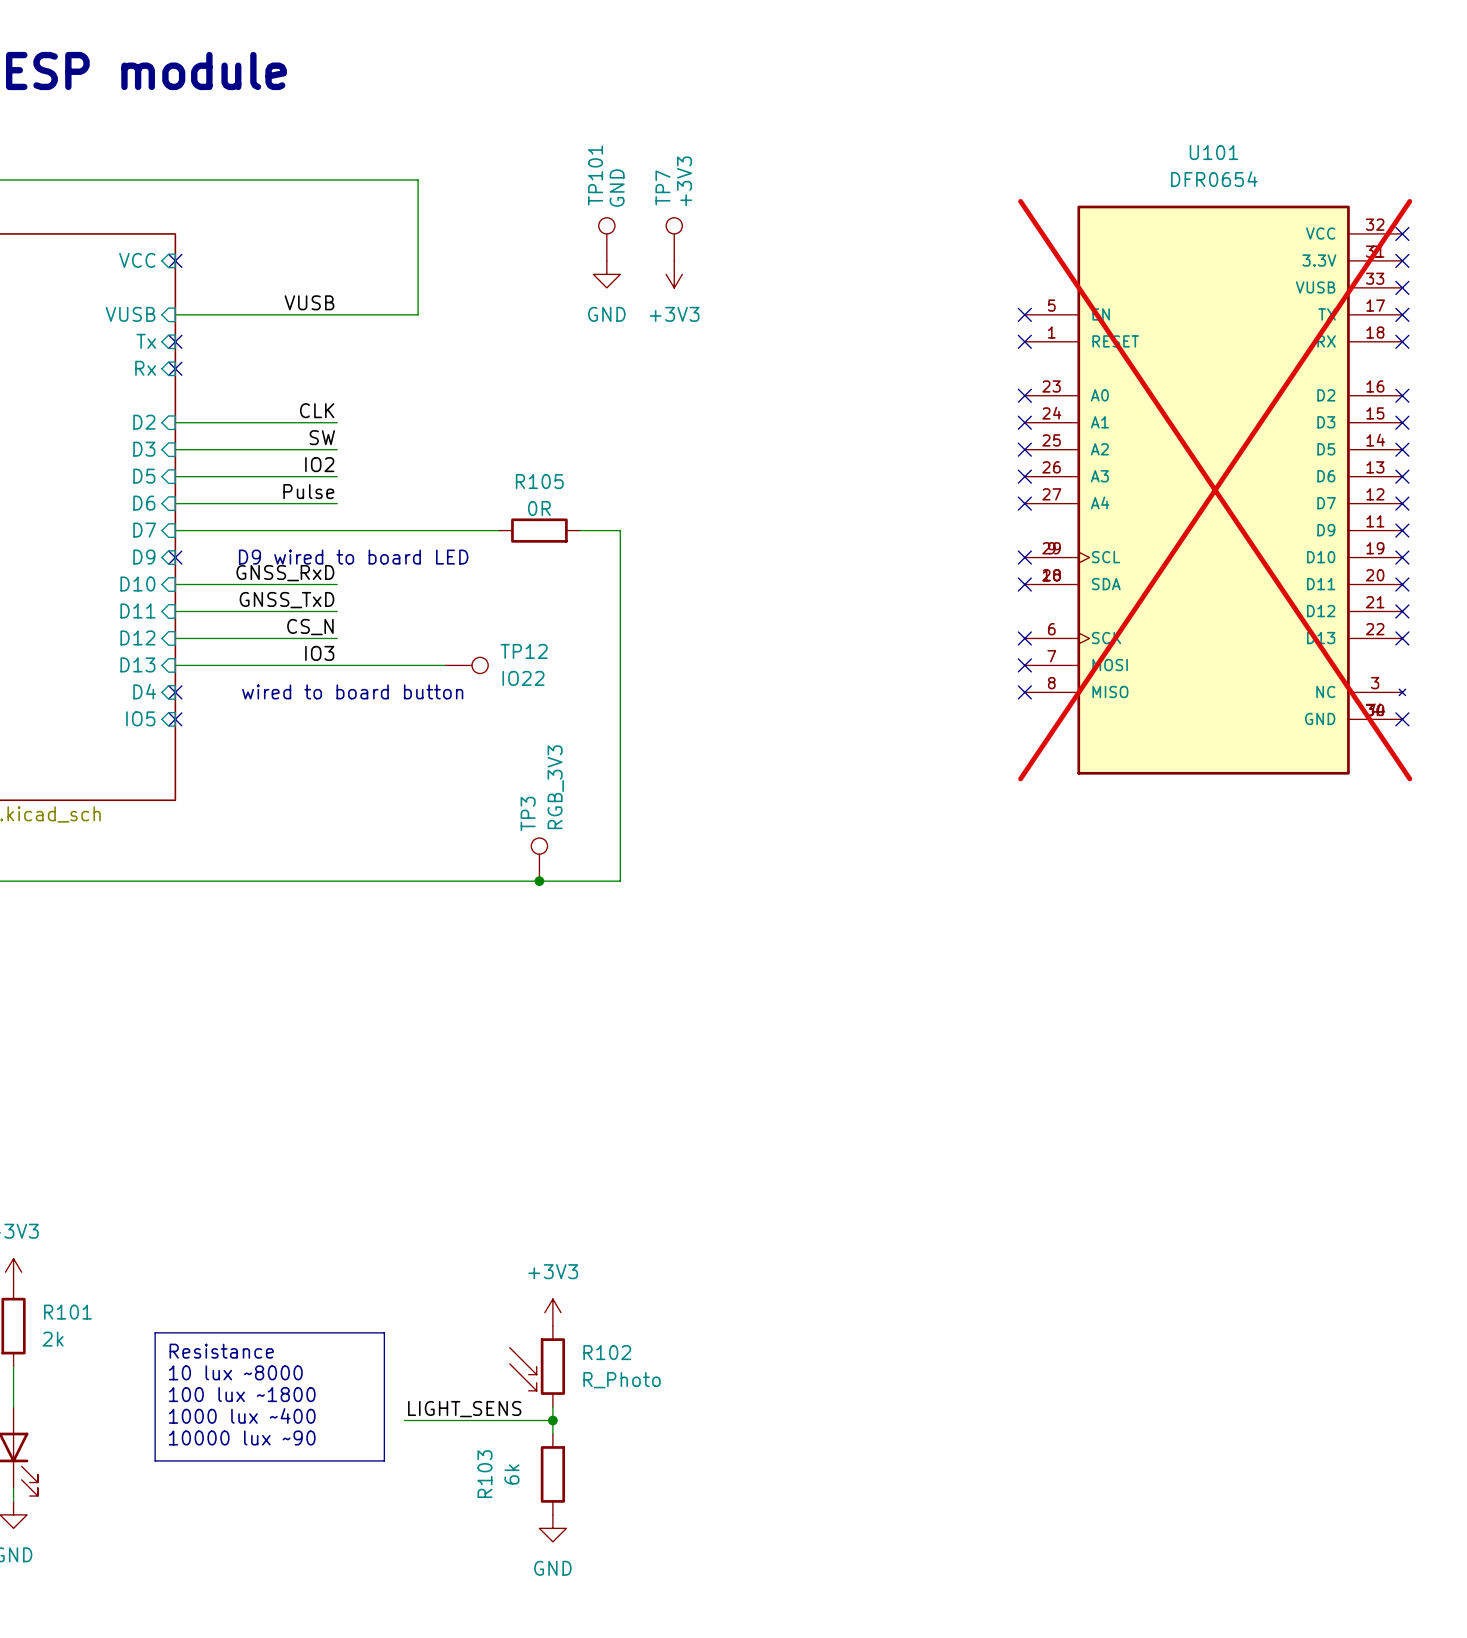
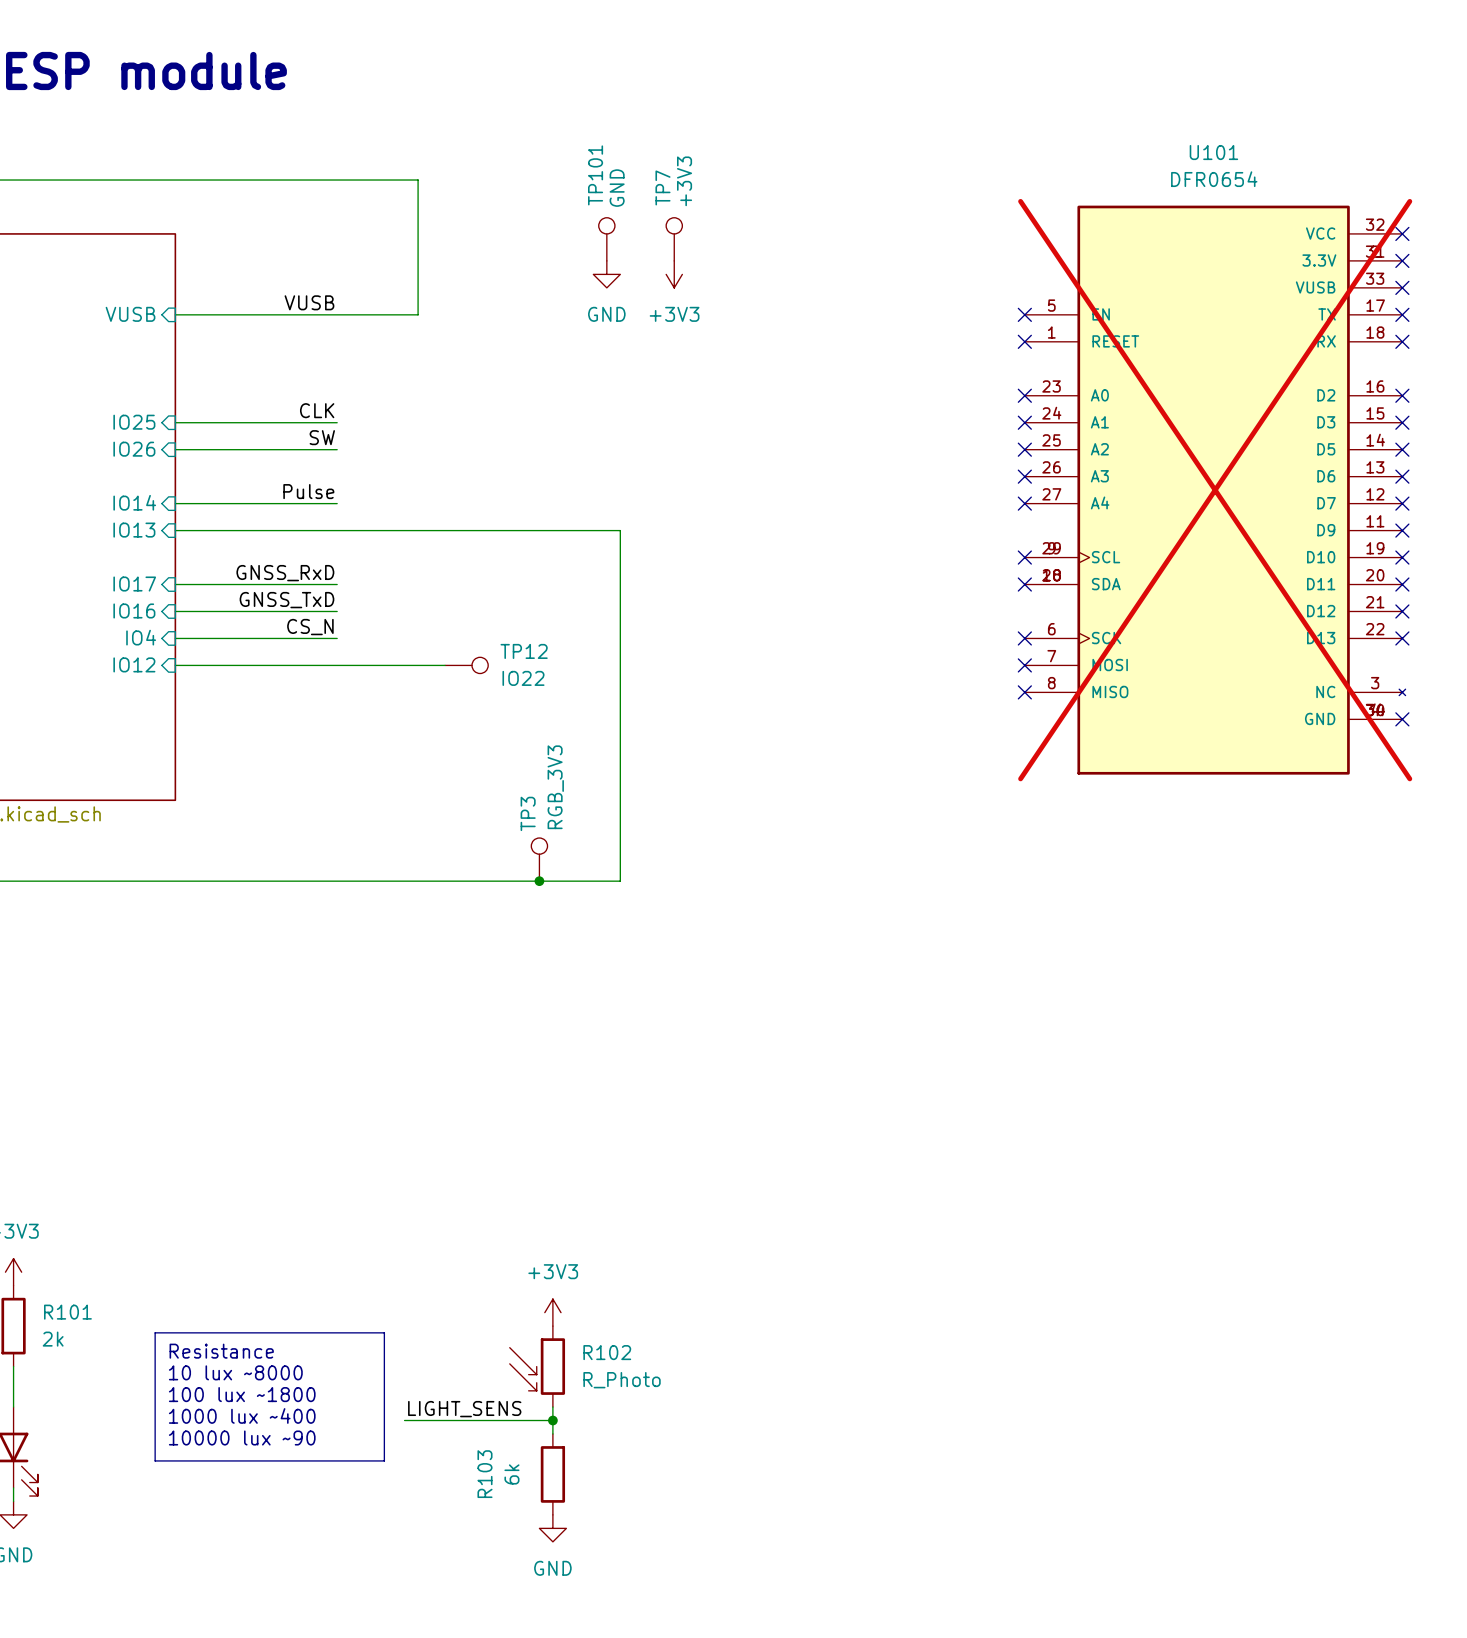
sheet pin: VCC (137, 260) -> none
no-connect mark: (175, 260) -> none
sheet pin: Tx (146, 341) -> none
no-connect mark: (175, 341) -> none
sheet pin: Rx (145, 368) -> none
no-connect mark: (175, 368) -> none
sheet pin: D2 (144, 422) -> IO25 (134, 422)
sheet pin: D3 (144, 449) -> IO26 (134, 449)
label: IO2 (319, 464) -> none
sheet pin: D5 (144, 476) -> none
wire: (175, 476) (337, 476) -> none
sheet pin: D6 (144, 503) -> IO14 (134, 502)
sheet pin: D7 (144, 530) -> IO13 (134, 530)
wire: none -> (498, 530) (579, 530)
R105: 0R (539, 530) -> none
sheet pin: D9 (144, 557) -> none
no-connect mark: (175, 557) -> none
text: D9 wired to board LED (353, 557) -> none
sheet pin: D10 (137, 584) -> IO17 (134, 584)
sheet pin: D11 (137, 610) -> IO16 (134, 610)
sheet pin: D12 (137, 637) -> IO4 (141, 637)
label: IO3 (319, 653) -> none
sheet pin: D13 (137, 664) -> IO12 (134, 664)
sheet pin: D4 (144, 691) -> none
text: wired to board button (352, 691) -> none
no-connect mark: (175, 692) -> none
sheet pin: IO5 (140, 718) -> none
no-connect mark: (175, 719) -> none

